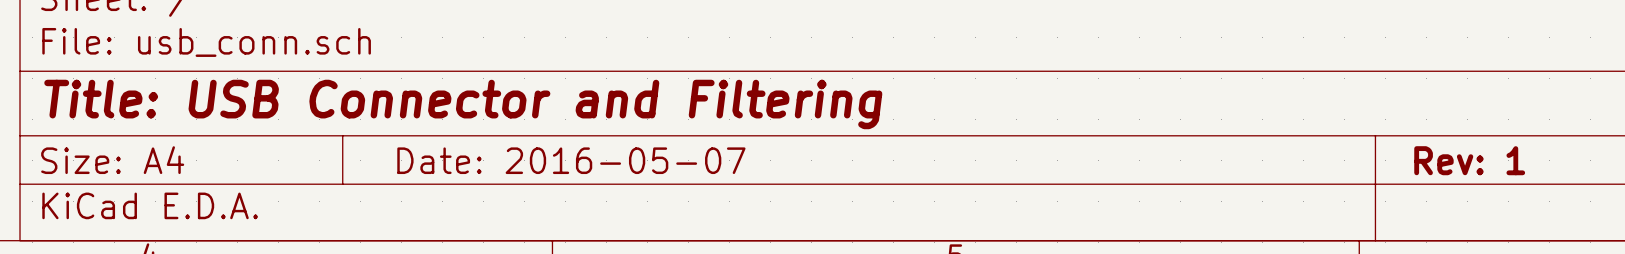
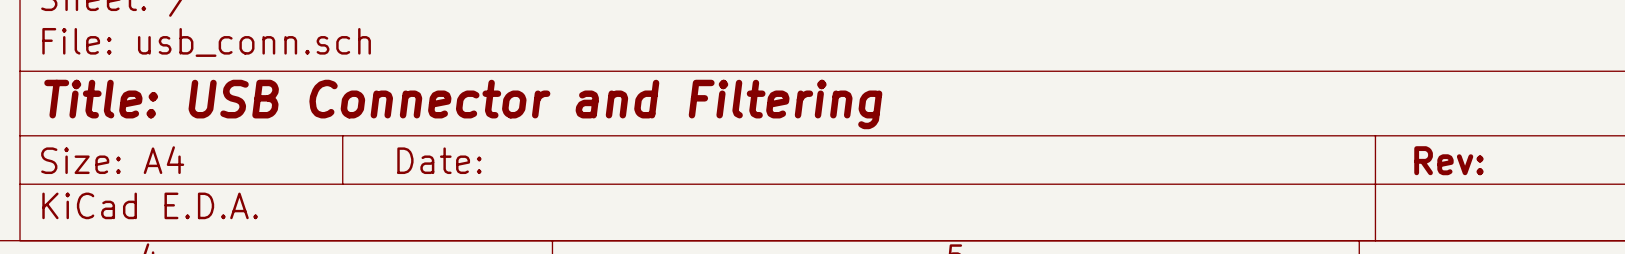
title block: Date: 2016-05-07 (571, 160) -> Date: (439, 160)
title block: Rev: 1 (1469, 160) -> Rev: (1448, 160)

